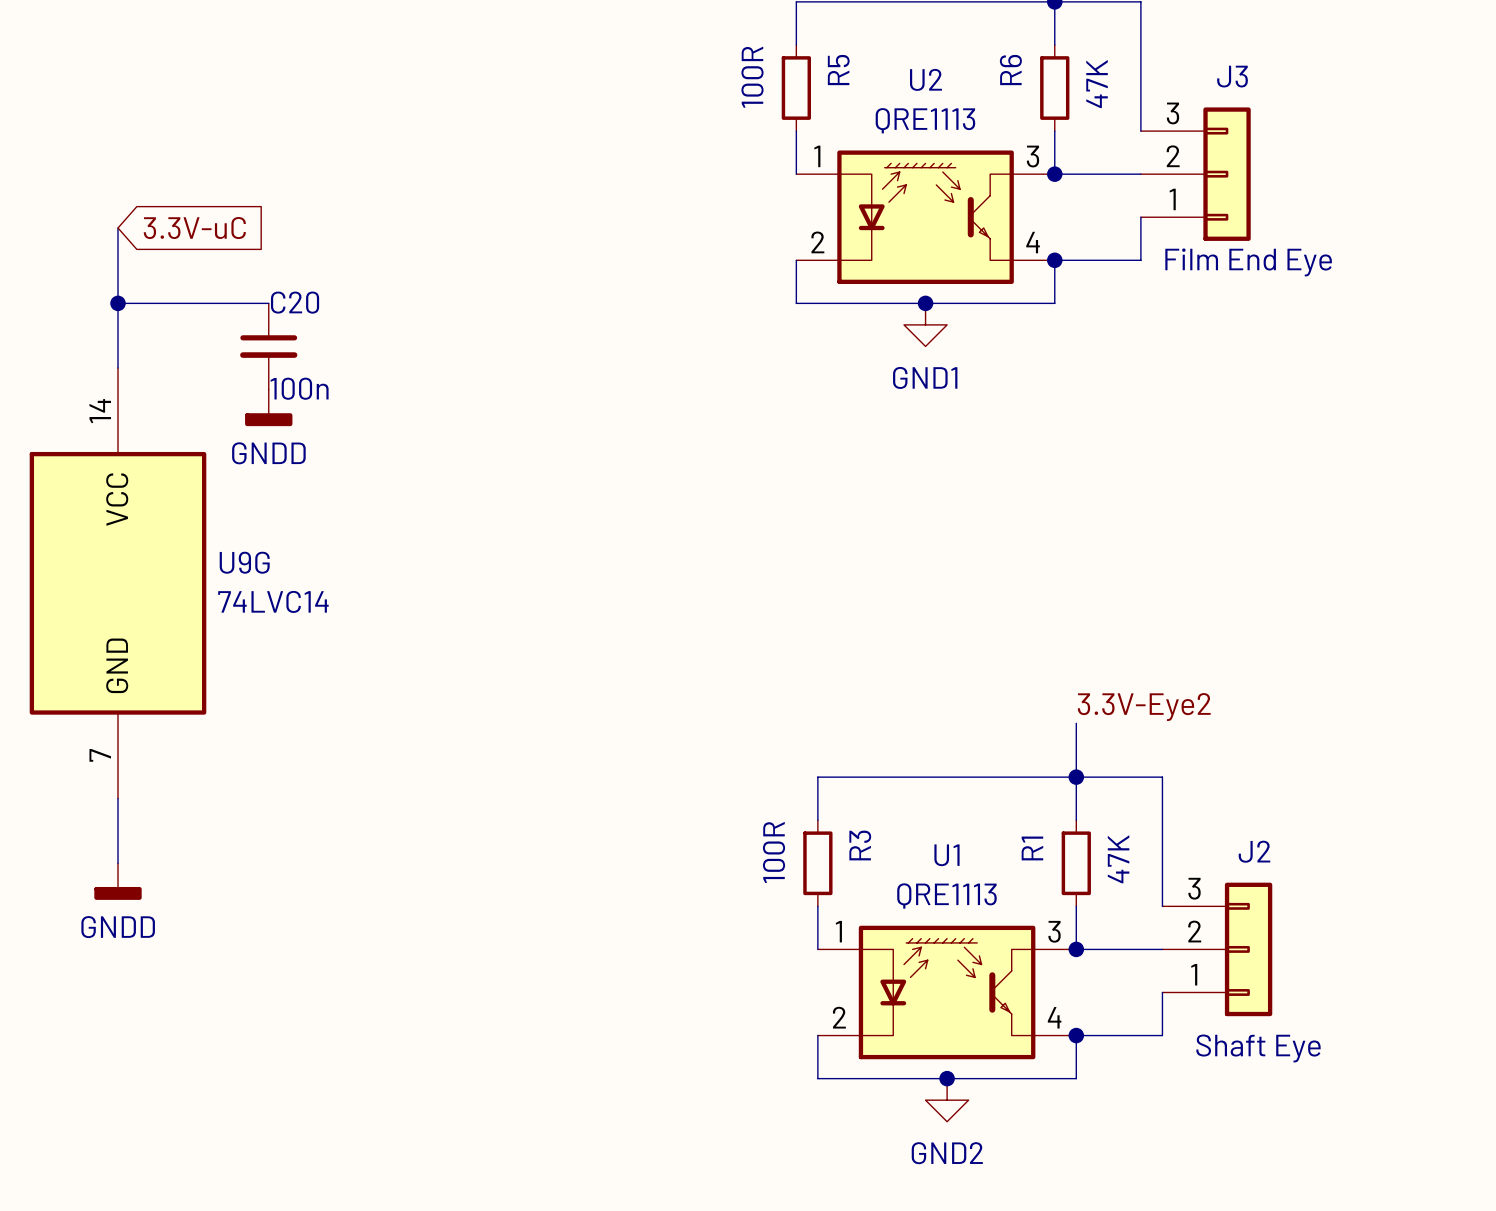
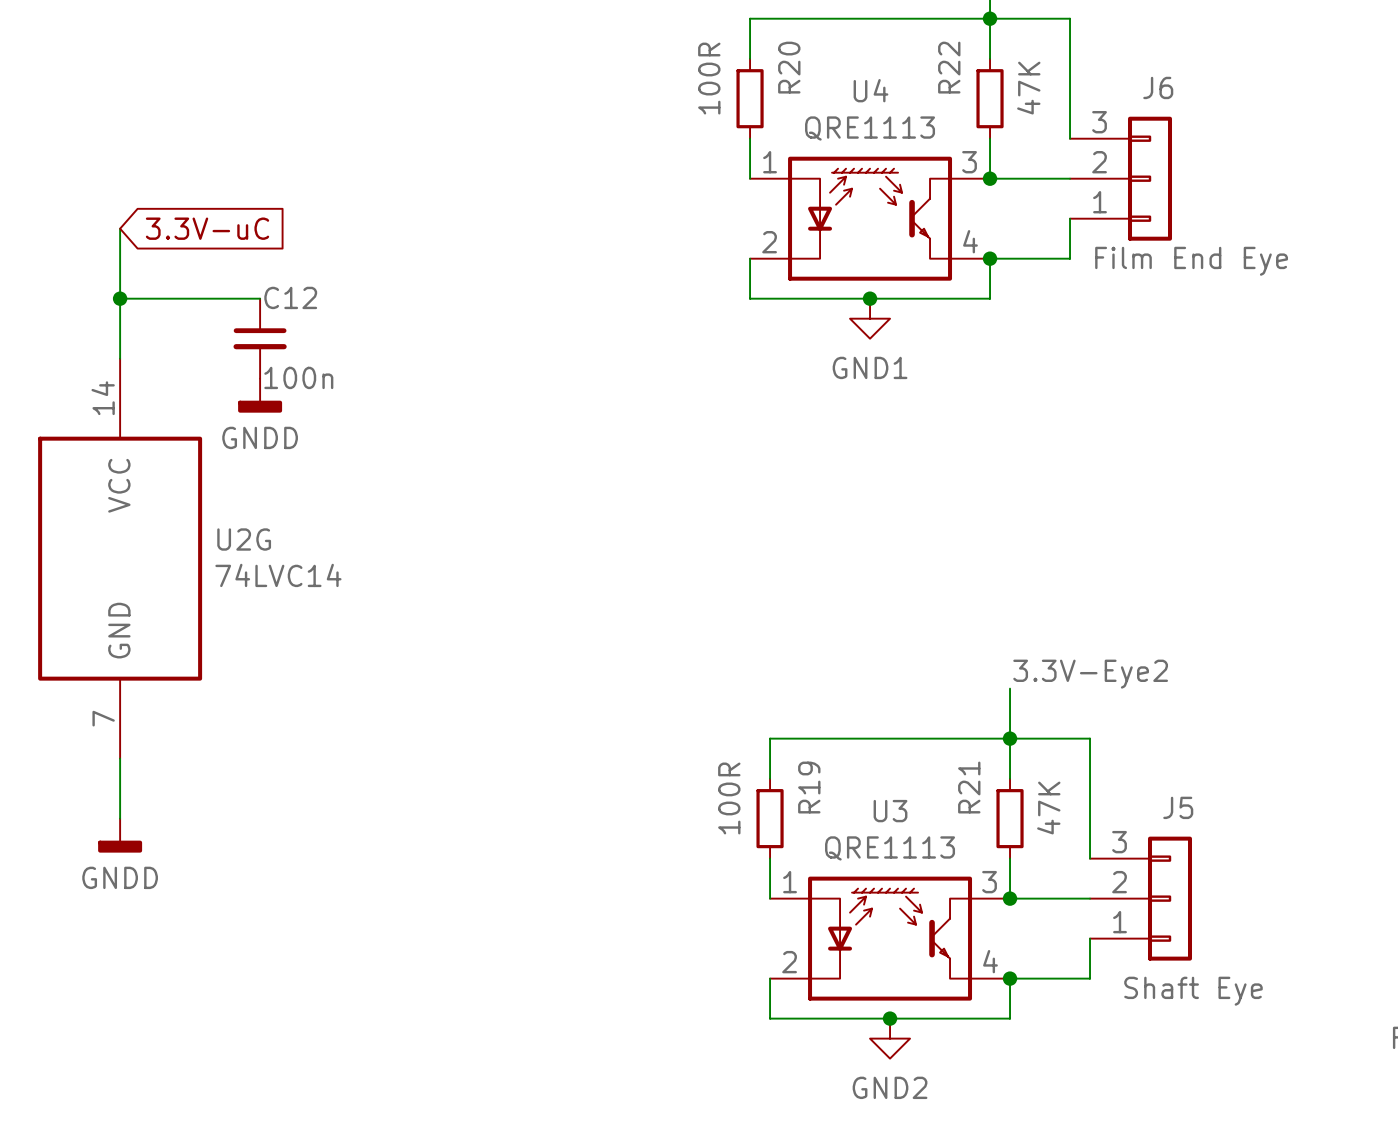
R5 name: R5 (838, 70) -> R20 (789, 67)
R6 name: R6 (1010, 70) -> R22 (949, 67)
J3 name: J3 (1232, 76) -> J6 (1158, 87)
U2 name: U2 (925, 79) -> U4 (870, 90)
C20 name: C20 (295, 302) -> C12 (290, 297)
U9G name: U9G (244, 562) -> U2G (244, 539)
R3 name: R3 (860, 845) -> R19 (809, 787)
R1 name: R1 (1032, 848) -> R21 (969, 787)
J2 name: J2 (1254, 851) -> J5 (1178, 807)
U1 name: U1 (946, 855) -> U3 (890, 811)

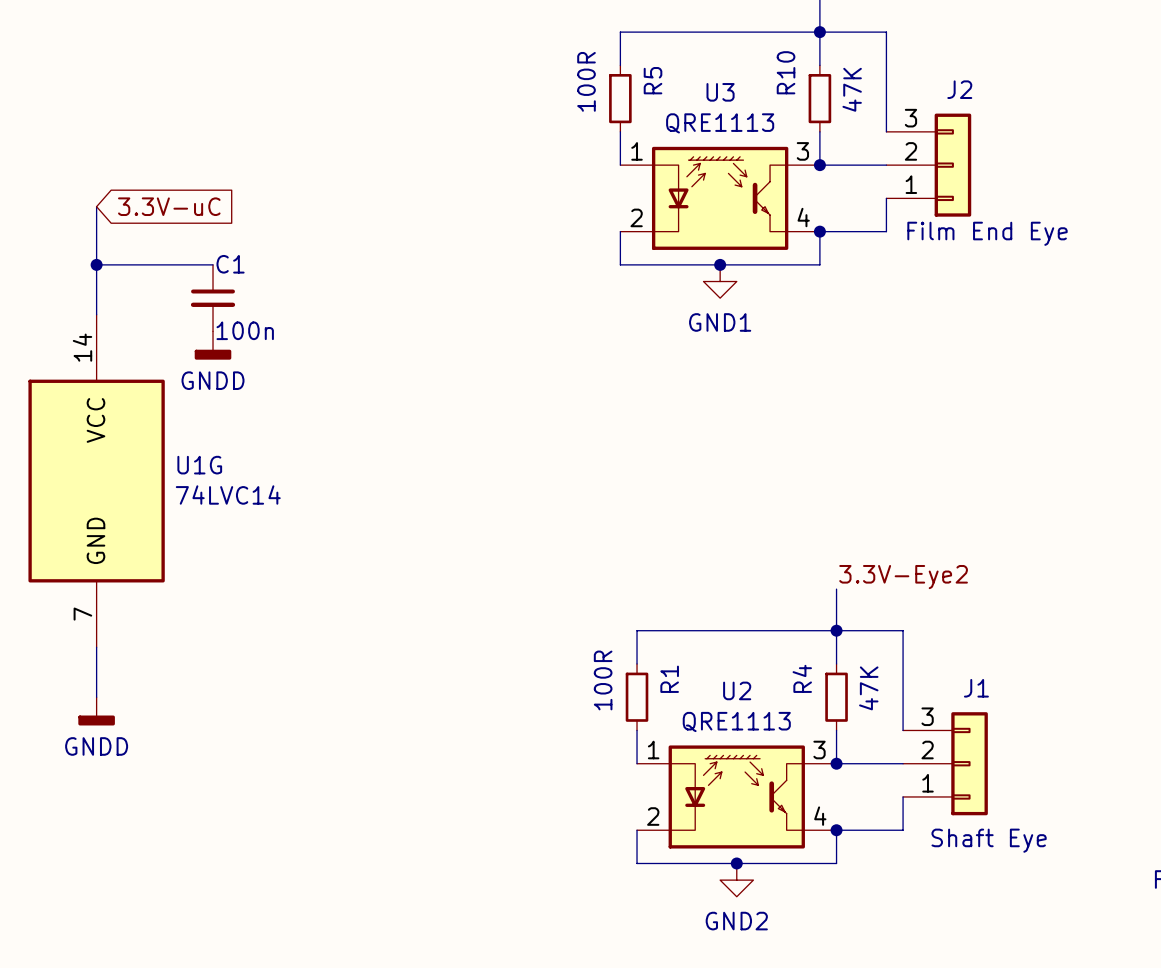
R20 name: R20 (789, 67) -> R5 (653, 80)
R22 name: R22 (949, 67) -> R10 (786, 72)
J6 name: J6 (1158, 87) -> J2 (959, 89)
U4 name: U4 (870, 90) -> U3 (720, 92)
C12 name: C12 (290, 297) -> C1 (230, 264)
U2G name: U2G (244, 539) -> U1G (199, 465)
R19 name: R19 (809, 787) -> R1 (669, 679)
R21 name: R21 (969, 787) -> R4 (802, 678)
J5 name: J5 (1178, 807) -> J1 (976, 688)
U3 name: U3 (890, 811) -> U2 (737, 690)

